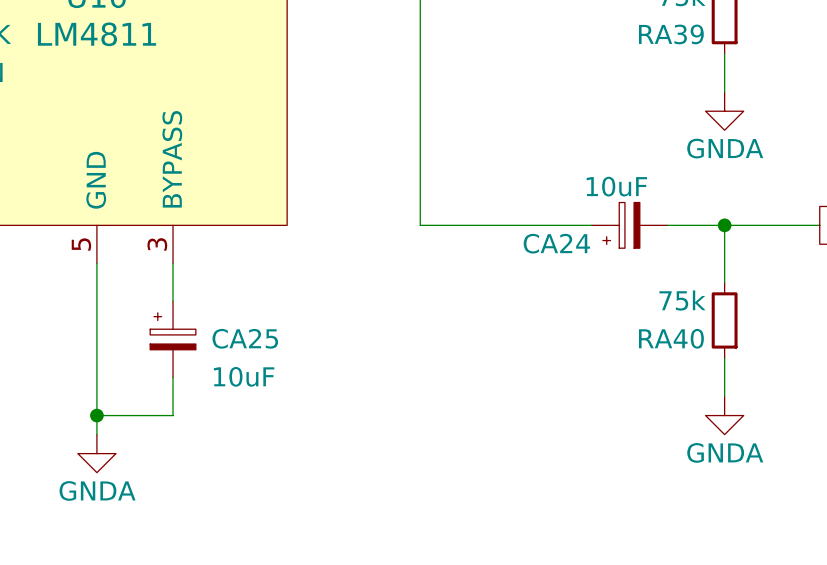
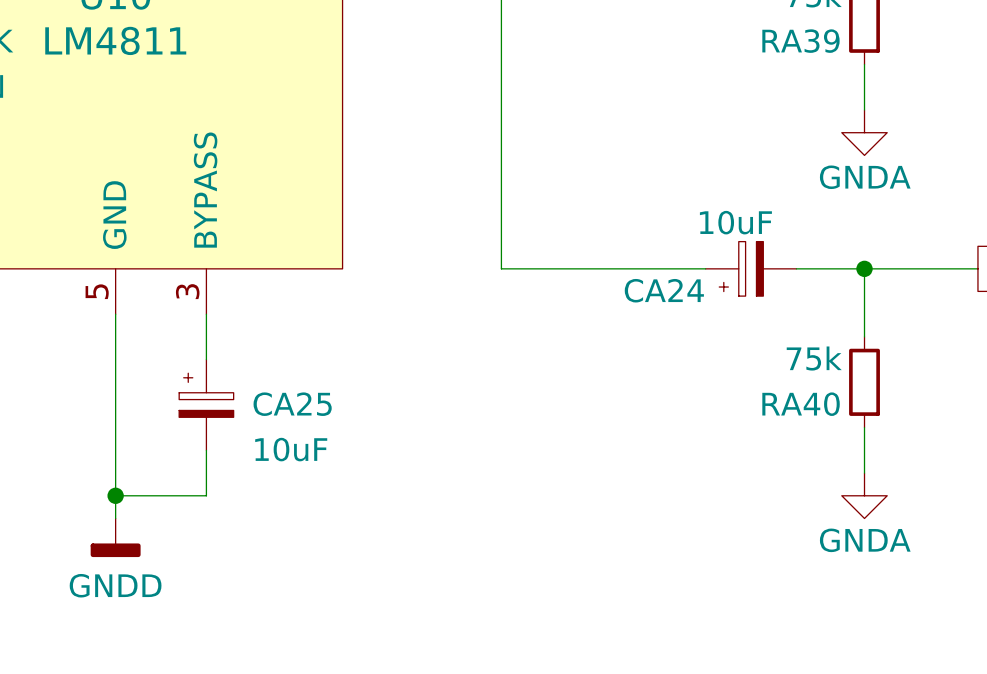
power symbol: GNDA (96, 453) -> GNDD (115, 537)

